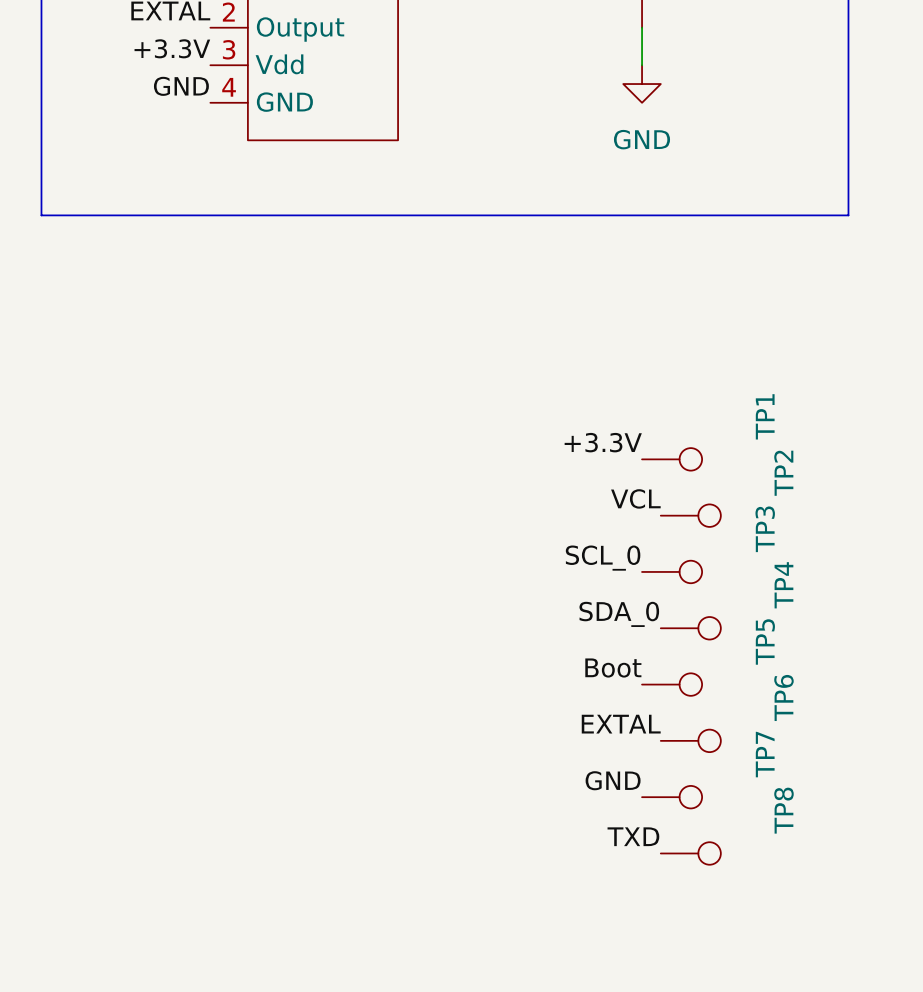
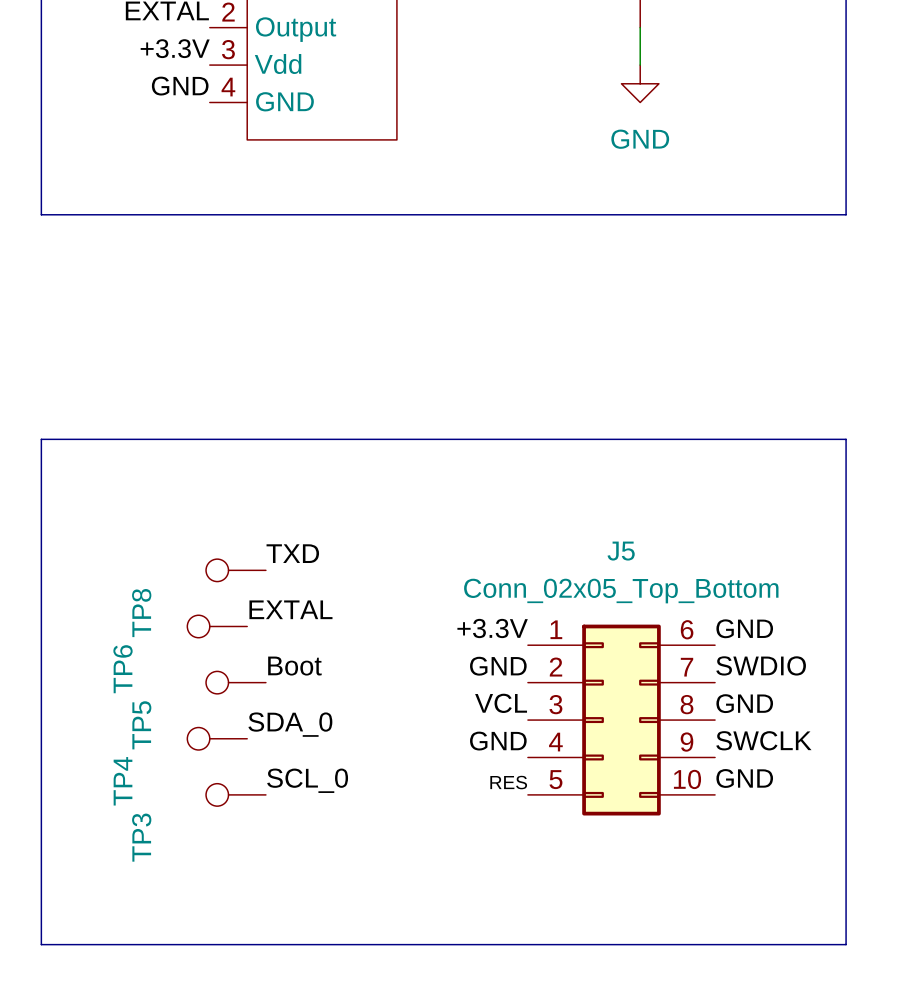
line: none -> (41, 439) (846, 439) (846, 944) (41, 944) (41, 439)
label position: +3.3V (603, 442) -> +3.3V (492, 628)
TP1: (672, 459) -> none
label position: VCL (635, 498) -> VCL (501, 703)
TP2: (690, 515) -> none
label: none -> TXD (292, 553)
label: SCL_0 (603, 558) -> none
TP3 position: (672, 571) -> (235, 794)
TP3 rotation: 0° (690, 571) -> 180° (217, 794)
label: none -> EXTAL (290, 609)
label: SDA_0 (619, 614) -> none
TP4 position: (690, 628) -> (217, 738)
TP4 rotation: 0° (709, 628) -> 180° (198, 738)
label: none -> GND (744, 628)
label: none -> SWDIO (761, 665)
label: none -> Boot (294, 666)
label: none -> GND (498, 666)
label: Boot (613, 668) -> none
TP5 position: (672, 684) -> (235, 682)
TP5 rotation: 0° (690, 684) -> 180° (217, 682)
label: none -> GND (744, 703)
J5: none -> Conn_02x05_Top_Bottom (621, 720)
label: EXTAL (621, 724) -> none
label: none -> SDA_0 (290, 724)
TP6 position: (690, 740) -> (217, 626)
TP6 rotation: 0° (709, 740) -> 180° (198, 626)
label: none -> SWCLK (763, 740)
label: none -> GND (498, 741)
label: GND (613, 780) -> none
label: none -> GND (744, 778)
label: none -> SCL_0 (307, 780)
label: none -> RES (508, 782)
TP7: (672, 797) -> none
label: TXD (633, 836) -> none
TP8 position: (690, 853) -> (235, 570)
TP8 rotation: 0° (709, 853) -> 180° (217, 570)

